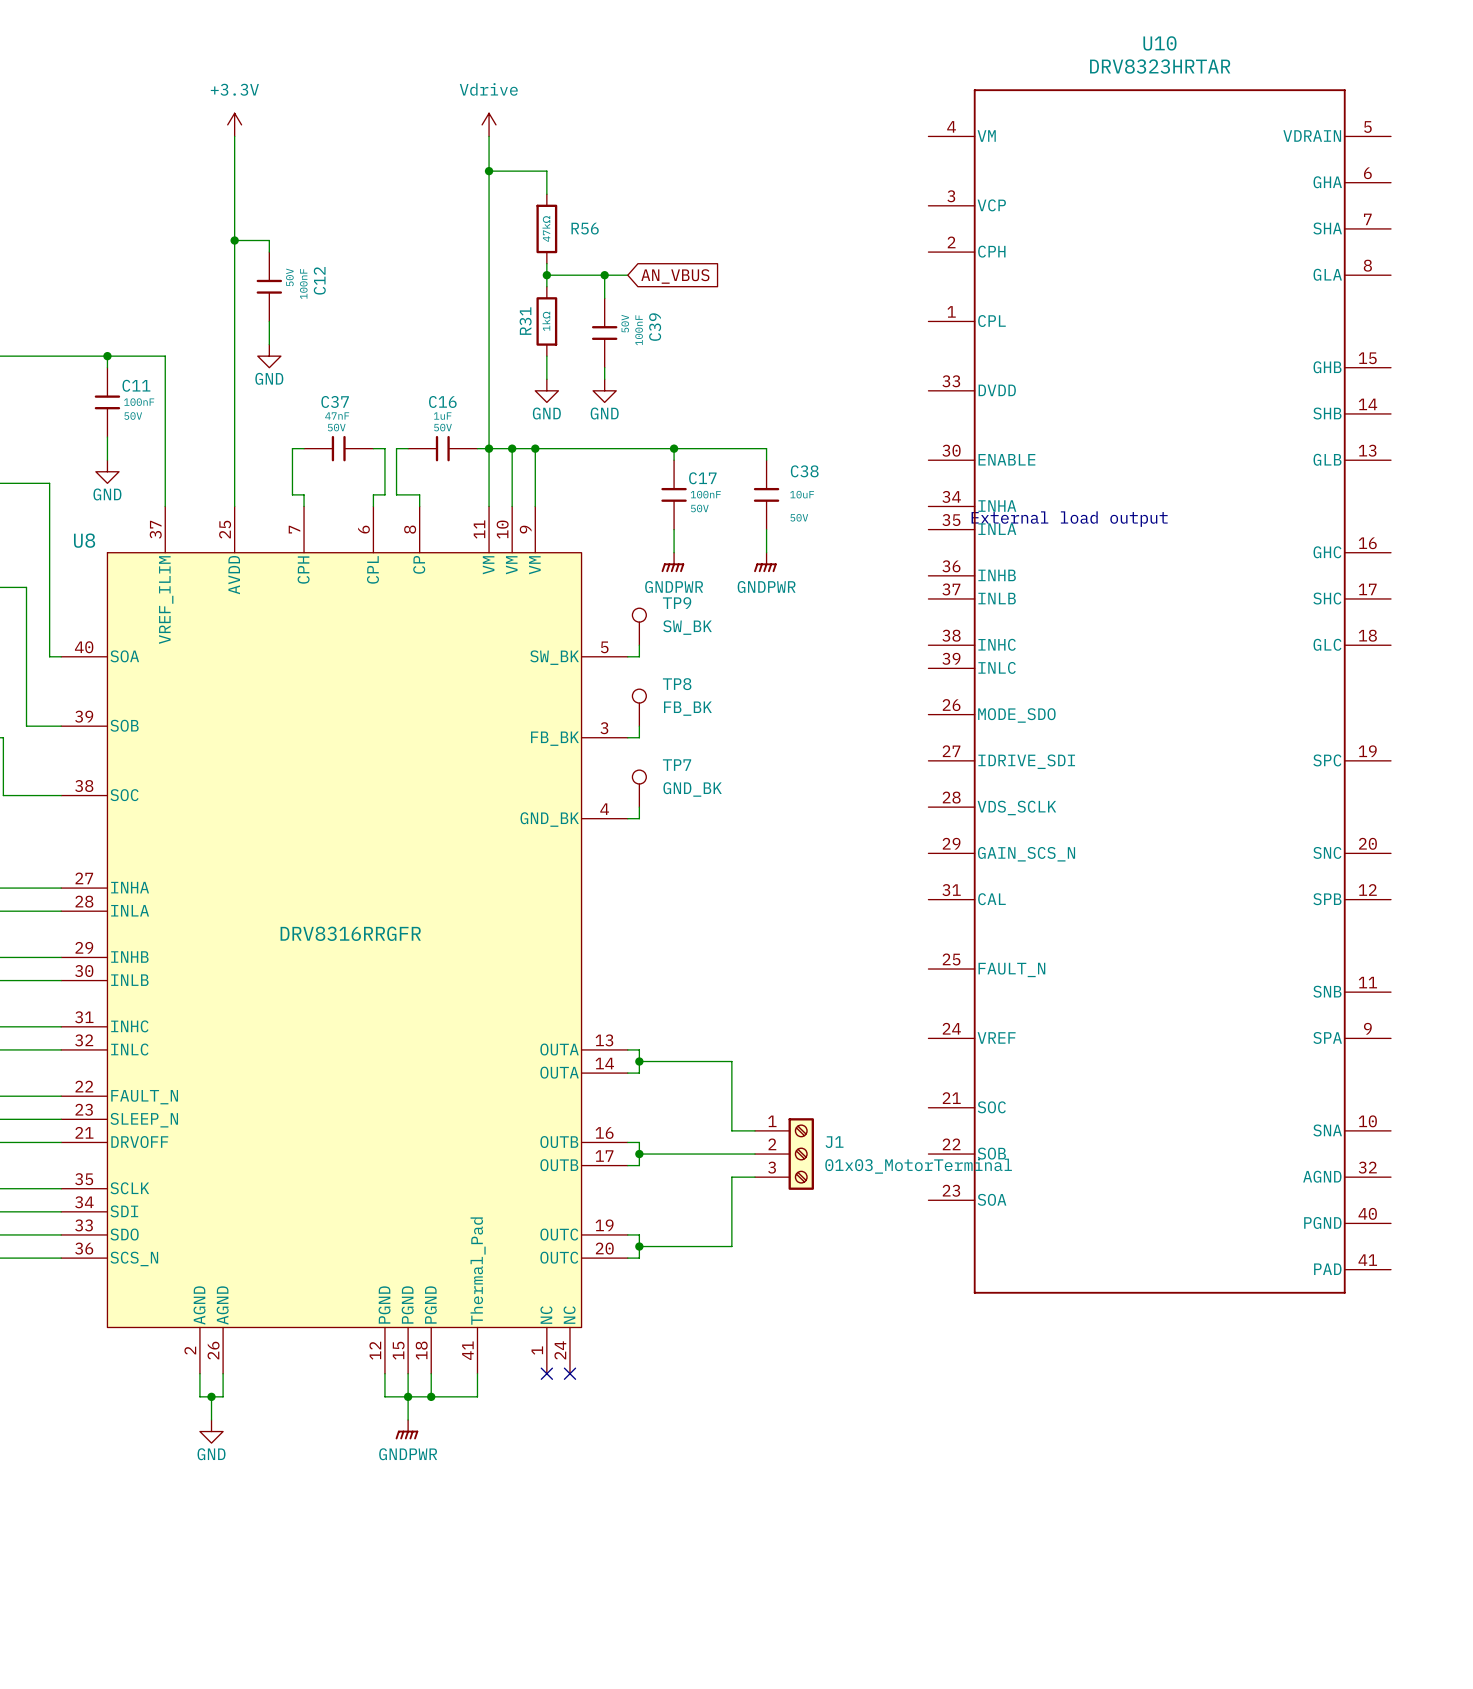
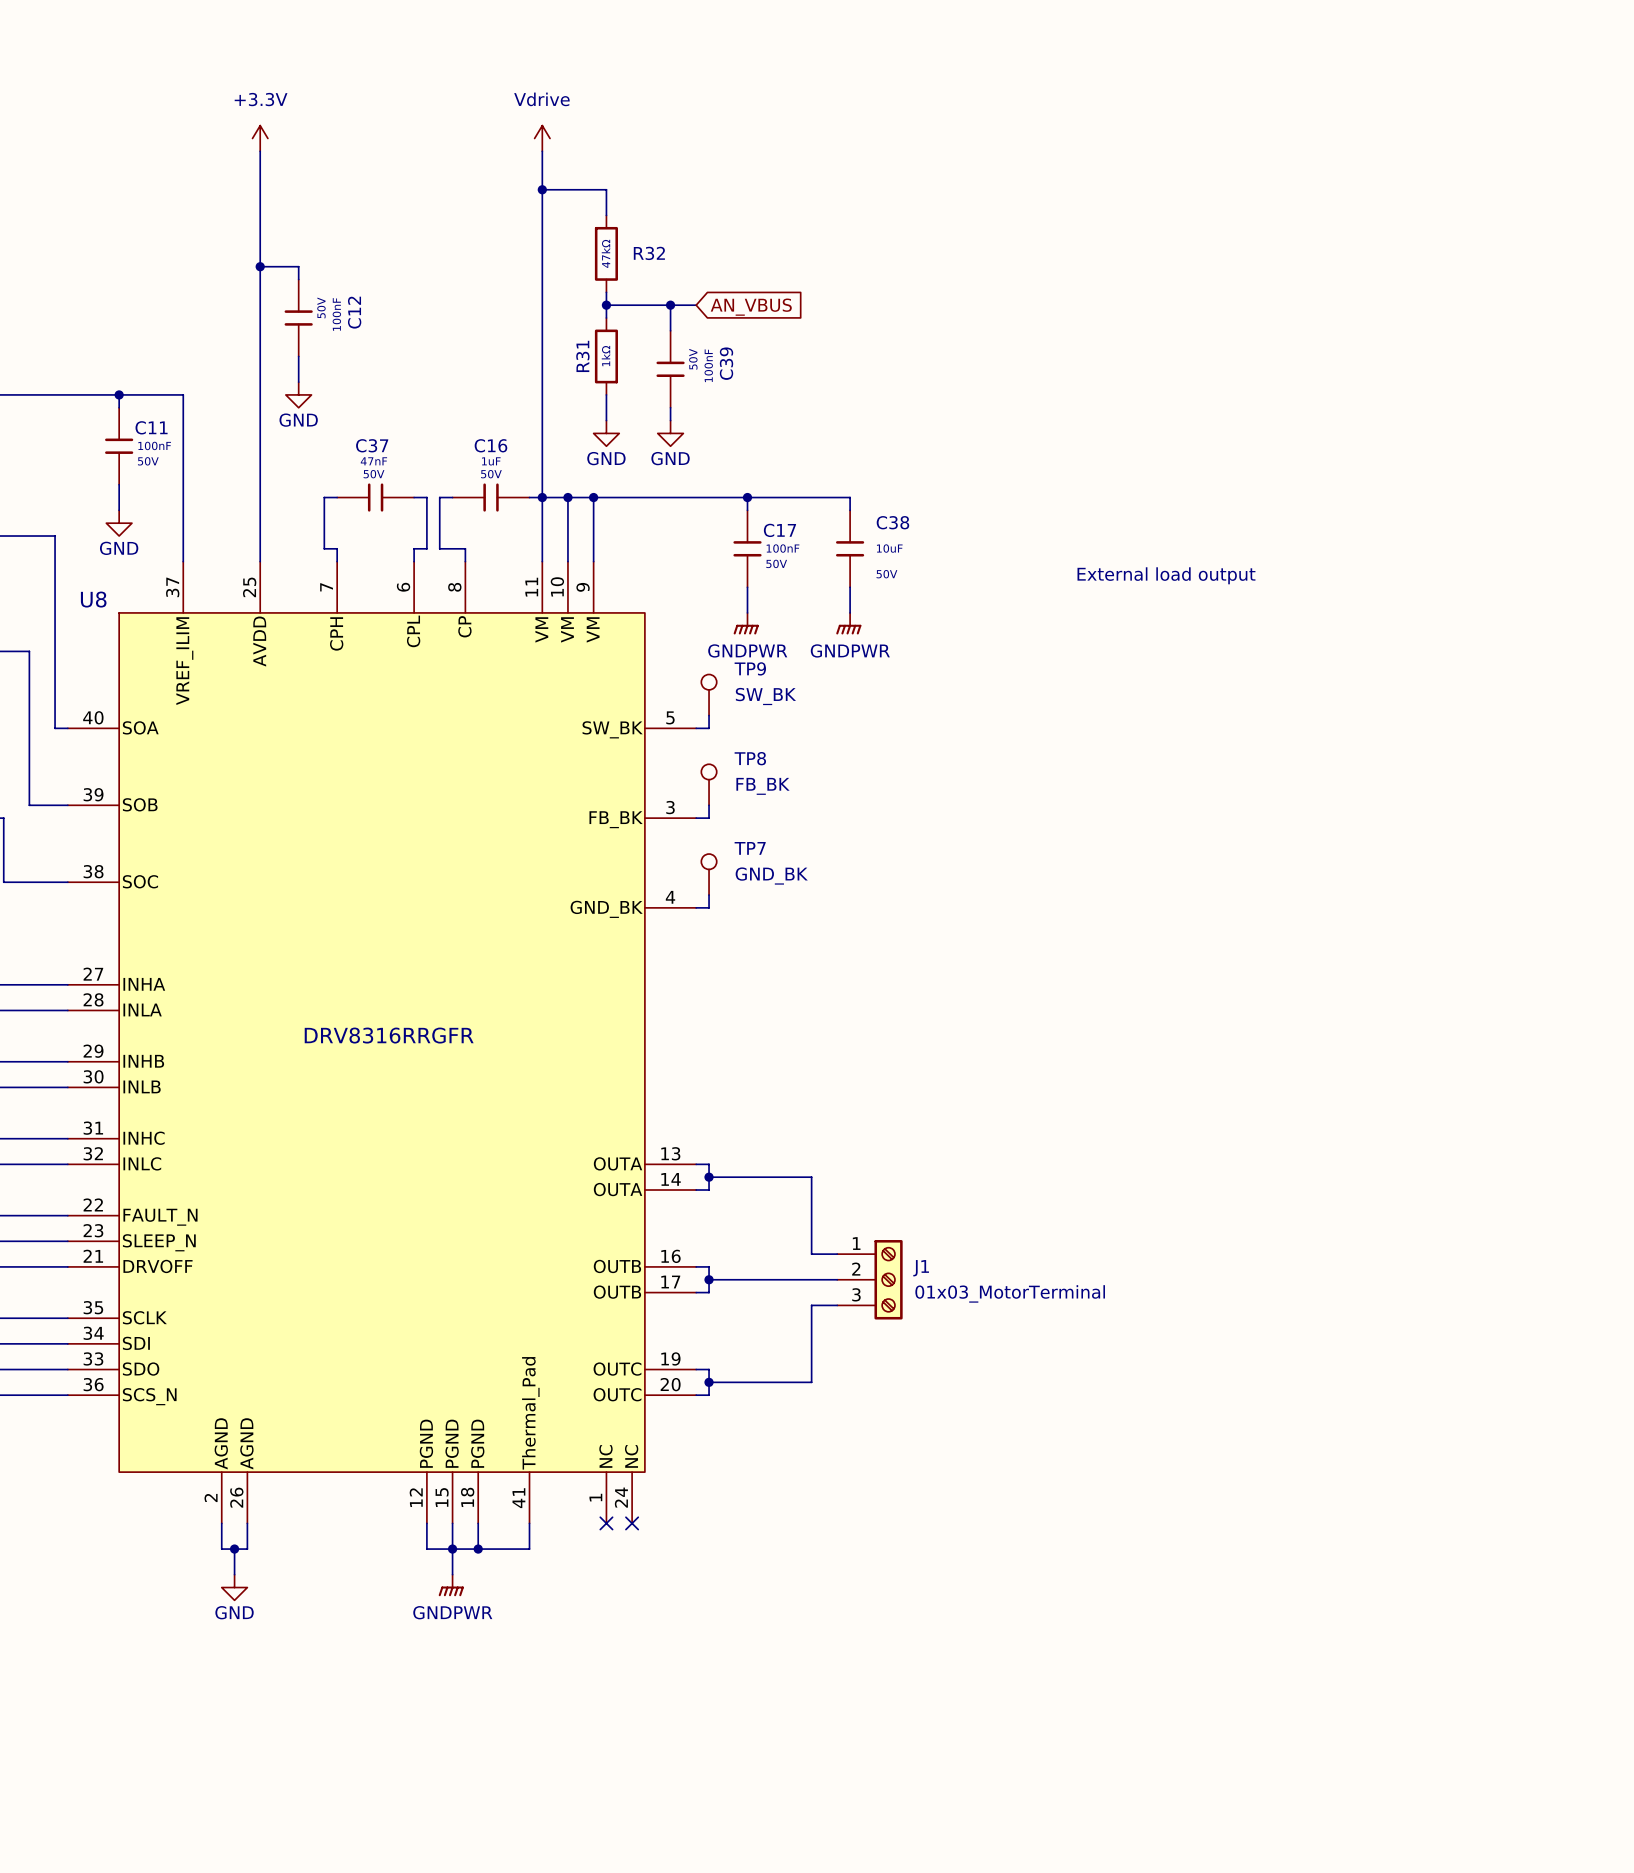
R56 name: R56 (585, 228) -> R32 (649, 253)
U10: DRV8323HRTAR (1159, 691) -> none

